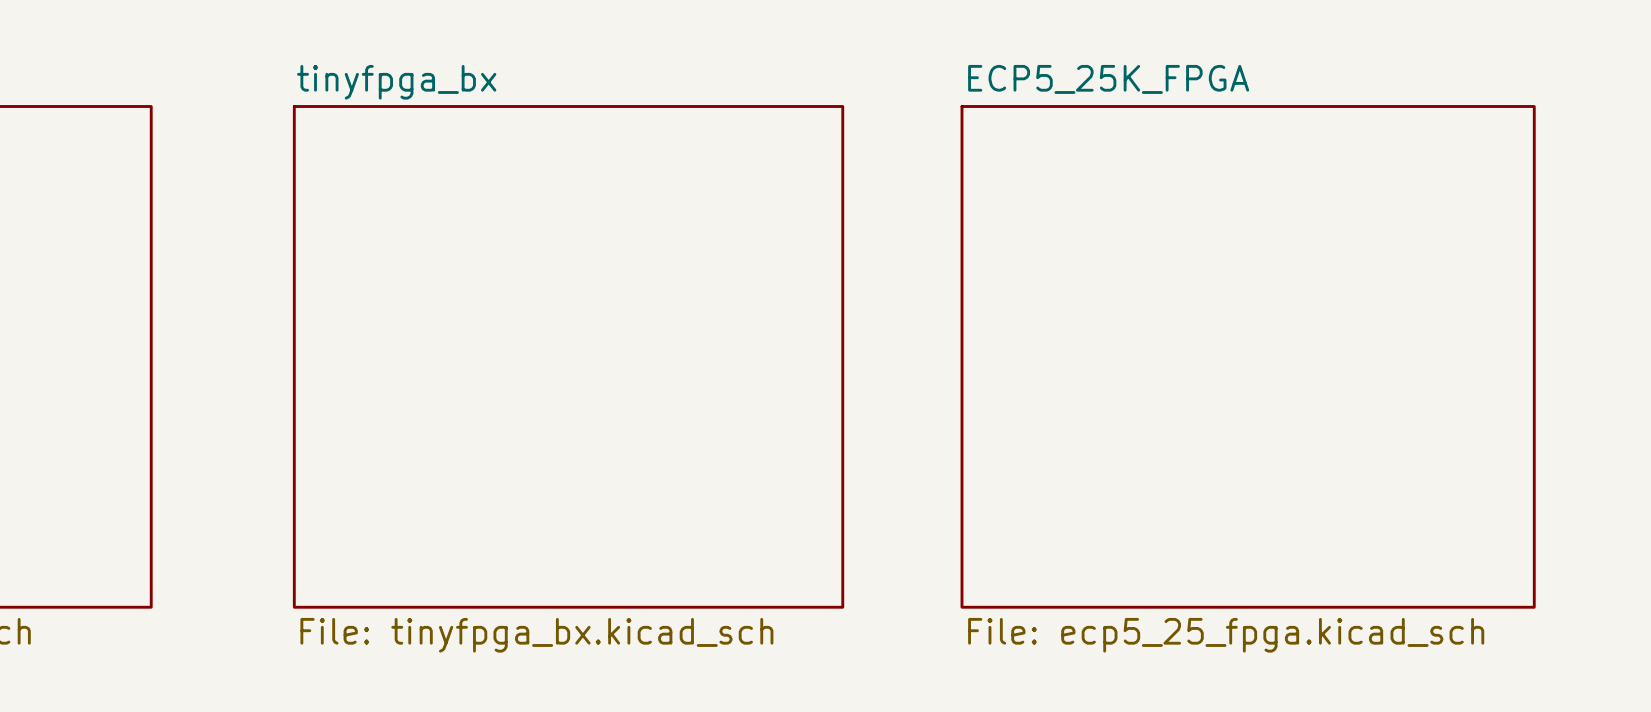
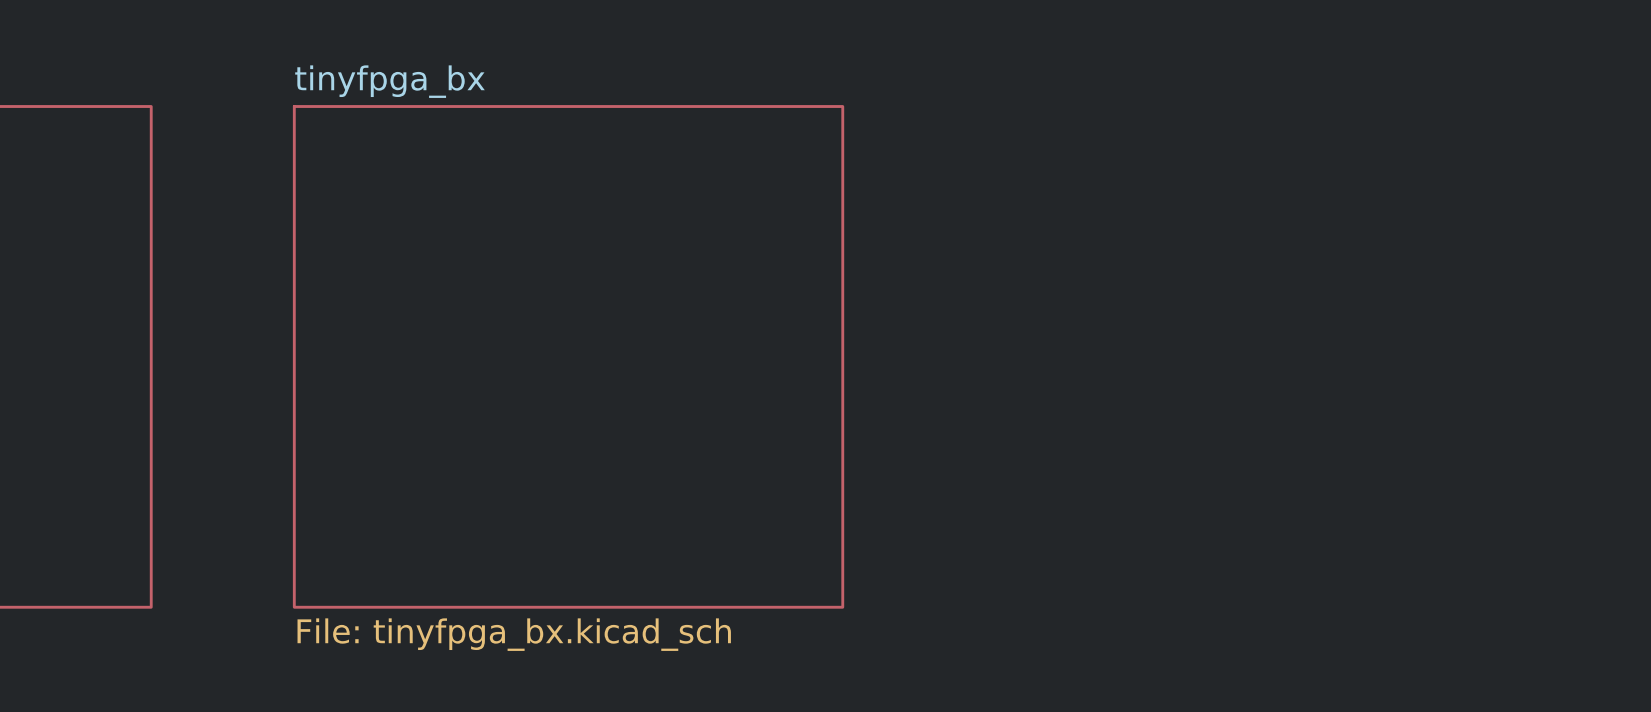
sheet ECP5_25K_FPGA: File: ecp5_25_fpga.kicad_sch (1248, 356) -> none

